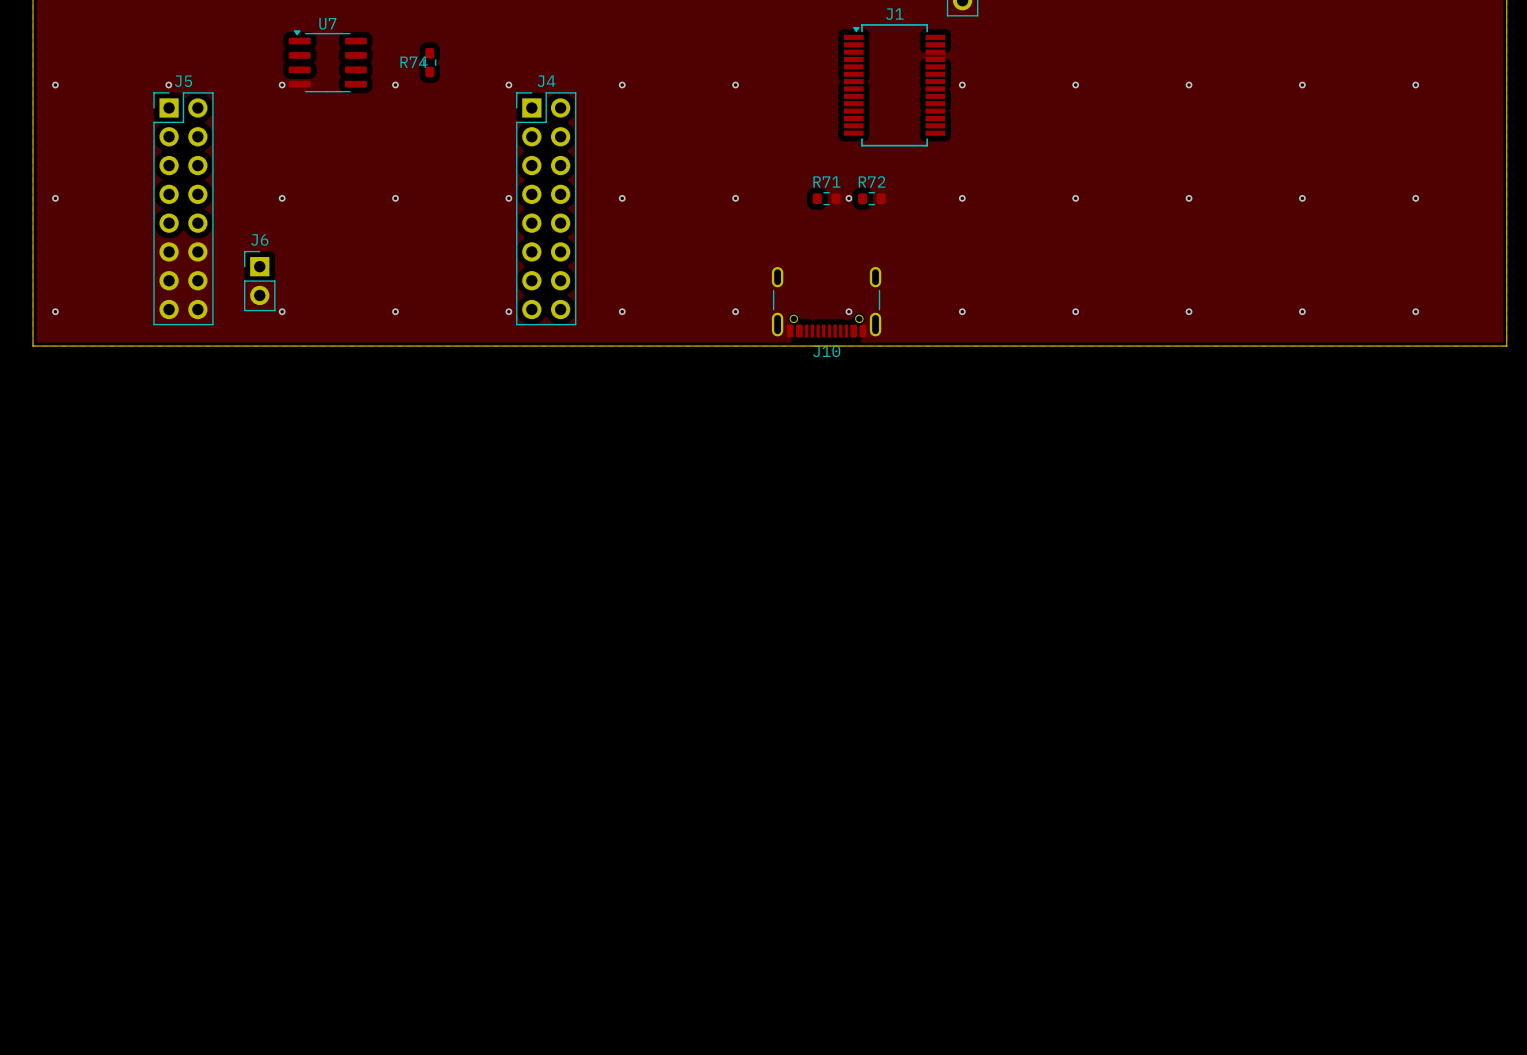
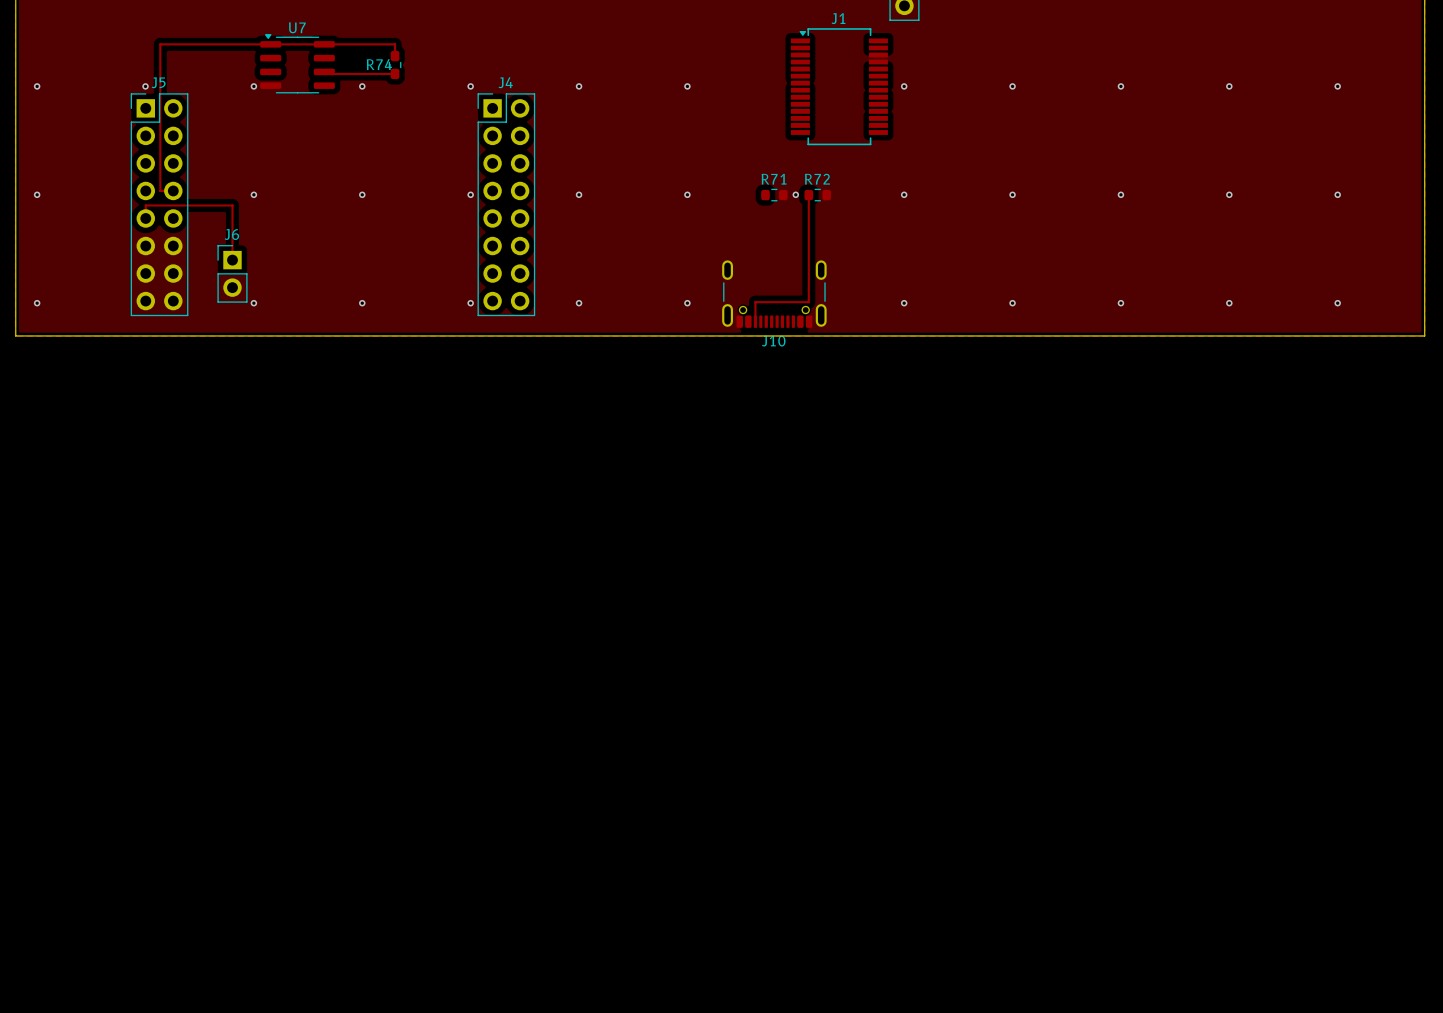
track: none -> (395, 56) (395, 44) (160, 44) (160, 190) (173, 190)
track: none -> (324, 71) (324, 73) (395, 73)
track: none -> (808, 195) (808, 302) (755, 302) (755, 321)
track: none -> (145, 218) (145, 205) (232, 205) (232, 260)
via: (848, 311) -> none

